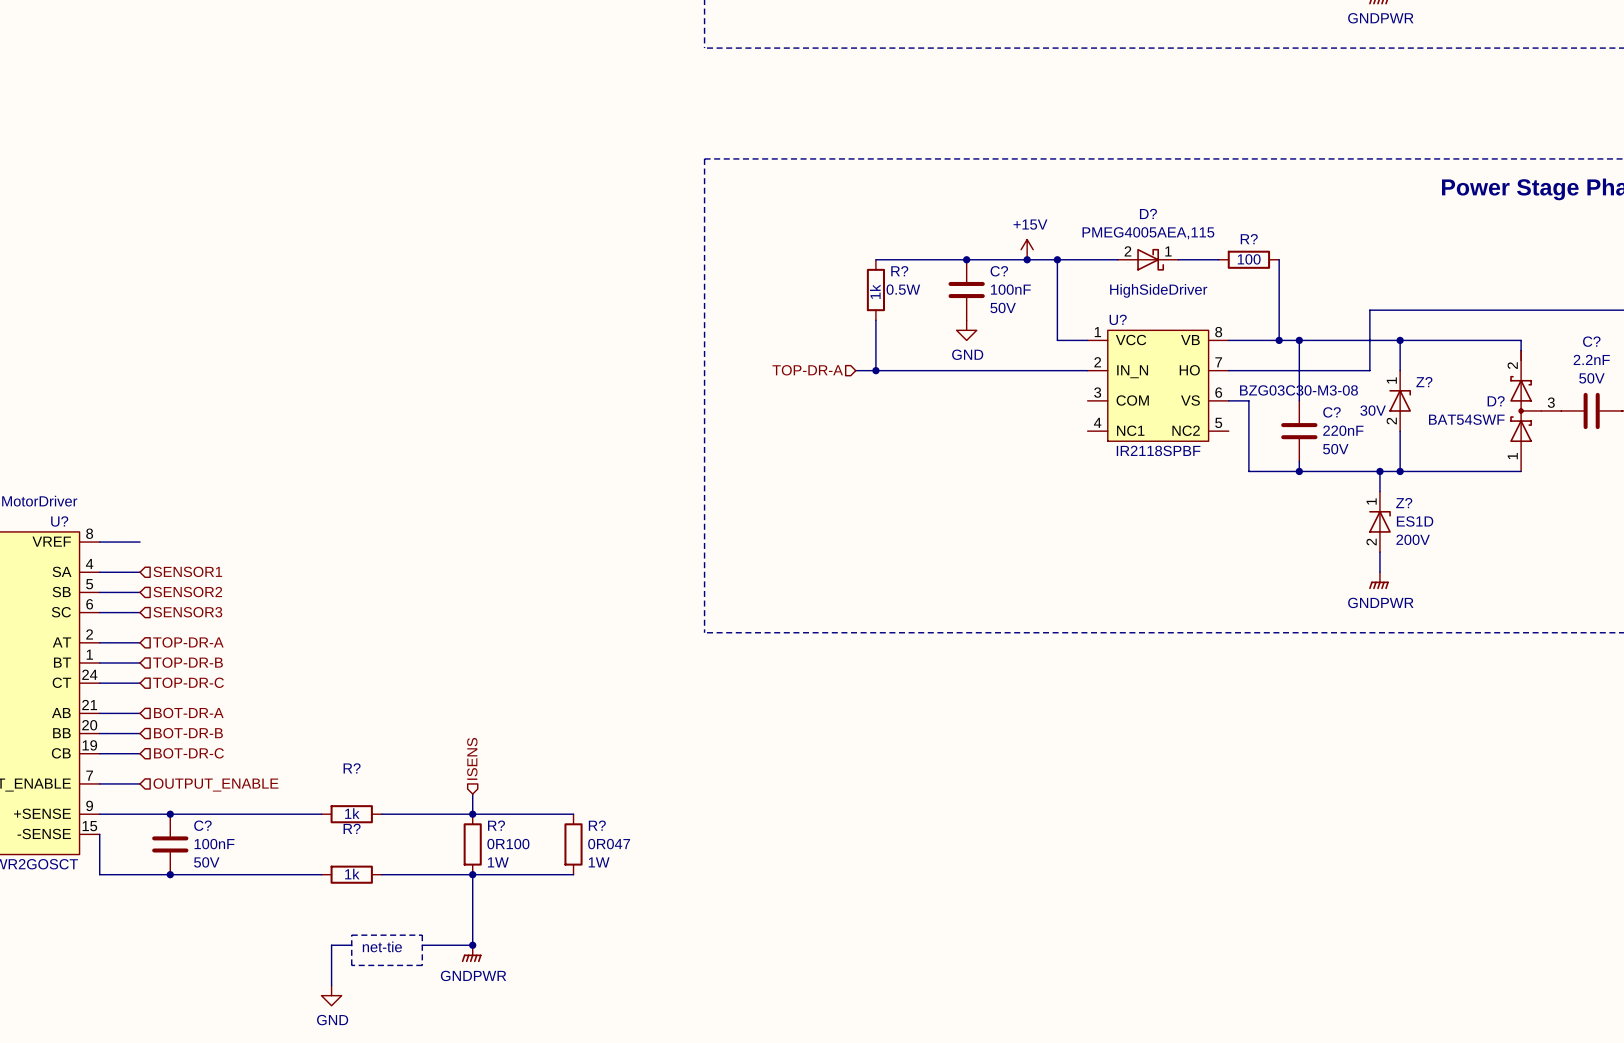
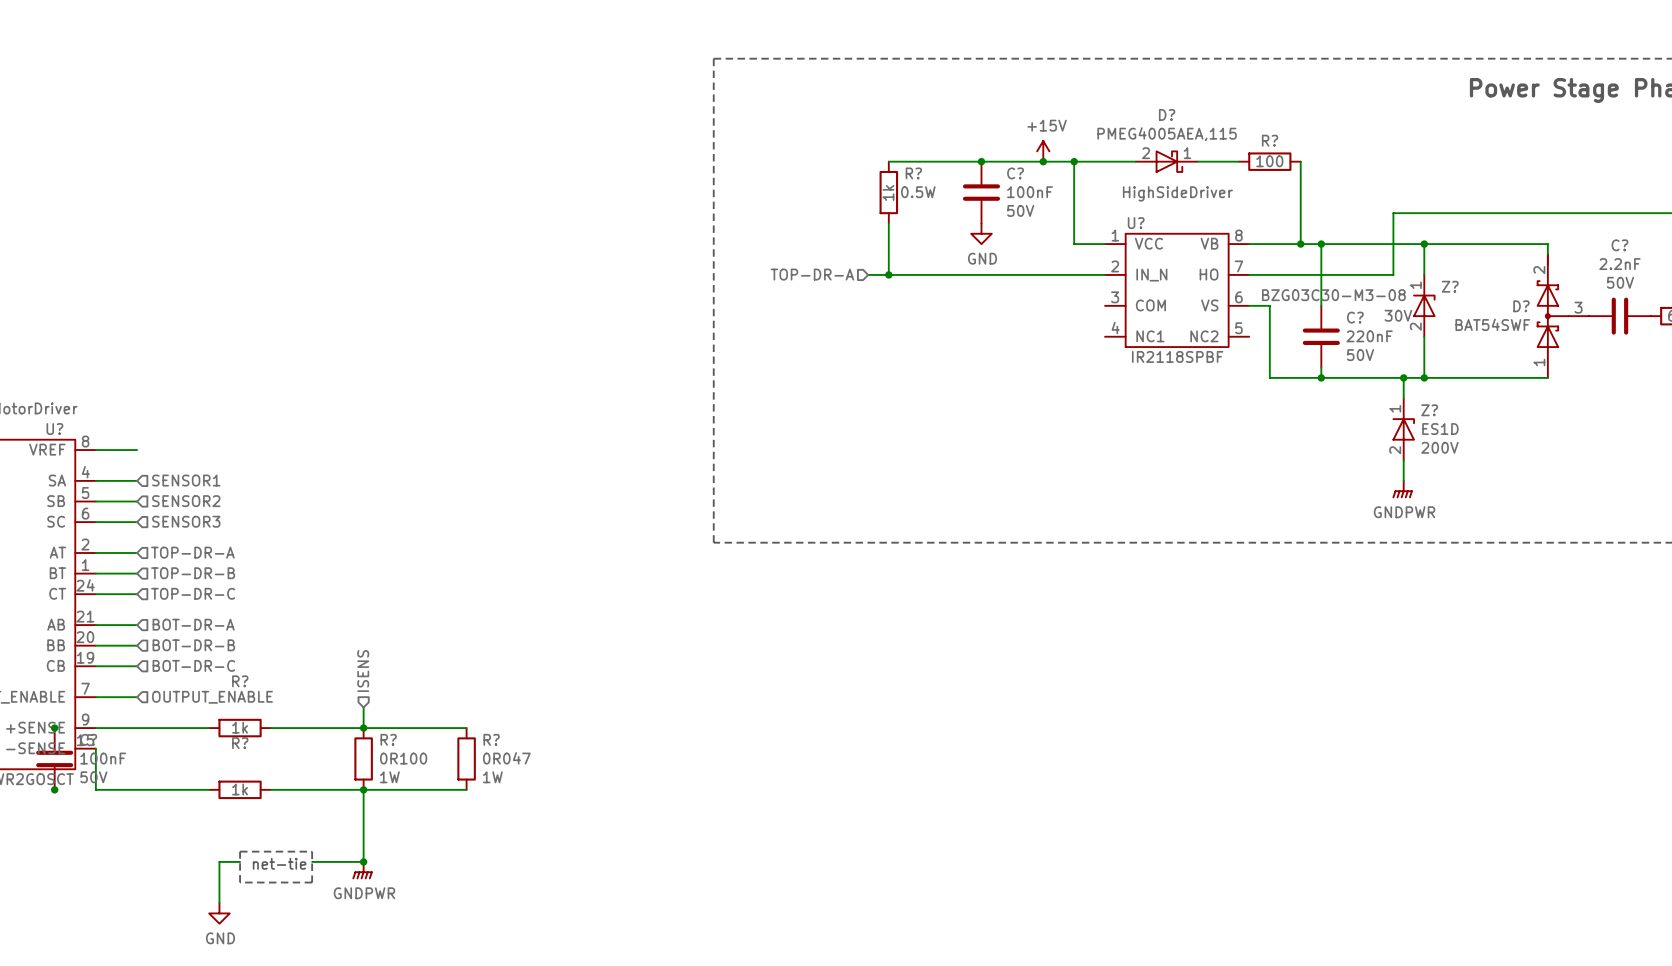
hierarchical label position: ISENS (472, 758) -> ISENS (363, 671)
wire: (472, 794) (472, 814) -> (363, 707) (363, 728)
junction: none -> (54, 728)
junction: (170, 814) -> none
wire: (210, 814) (271, 814) -> (322, 728) (384, 728)
R?: none -> (240, 728)
R?: (351, 814) -> none
junction: none -> (363, 728)
wire: (462, 814) (573, 814) -> none
junction: (472, 814) -> none
C? position: (170, 844) -> (54, 758)
R? position: (472, 844) -> (363, 758)
R? position: (573, 844) -> (466, 758)
junction: none -> (54, 789)
junction: (170, 874) -> none
wire: (210, 874) (271, 874) -> (322, 789) (384, 789)
R?: none -> (240, 789)
R?: (351, 874) -> none
wire: none -> (363, 789) (363, 861) (353, 861)
junction: none -> (363, 789)
wire: (462, 874) (573, 874) -> none
wire: (472, 874) (472, 945) (422, 945) -> none
junction: (472, 874) -> none
line: (351, 935) (422, 935) (422, 965) (351, 965) (351, 935) -> (240, 851) (312, 851) (312, 882) (240, 882) (240, 851)
wire: none -> (240, 861) (219, 861) (219, 903)
wire: (331, 945) (331, 985) -> (332, 861) (312, 861)
junction: none -> (363, 861)
junction: (472, 945) -> none
text position: net-tie (382, 946) -> net-tie (279, 863)
power symbol position: GNDPWR (471, 953) -> GNDPWR (362, 870)
power symbol position: GND (331, 995) -> GND (219, 913)

